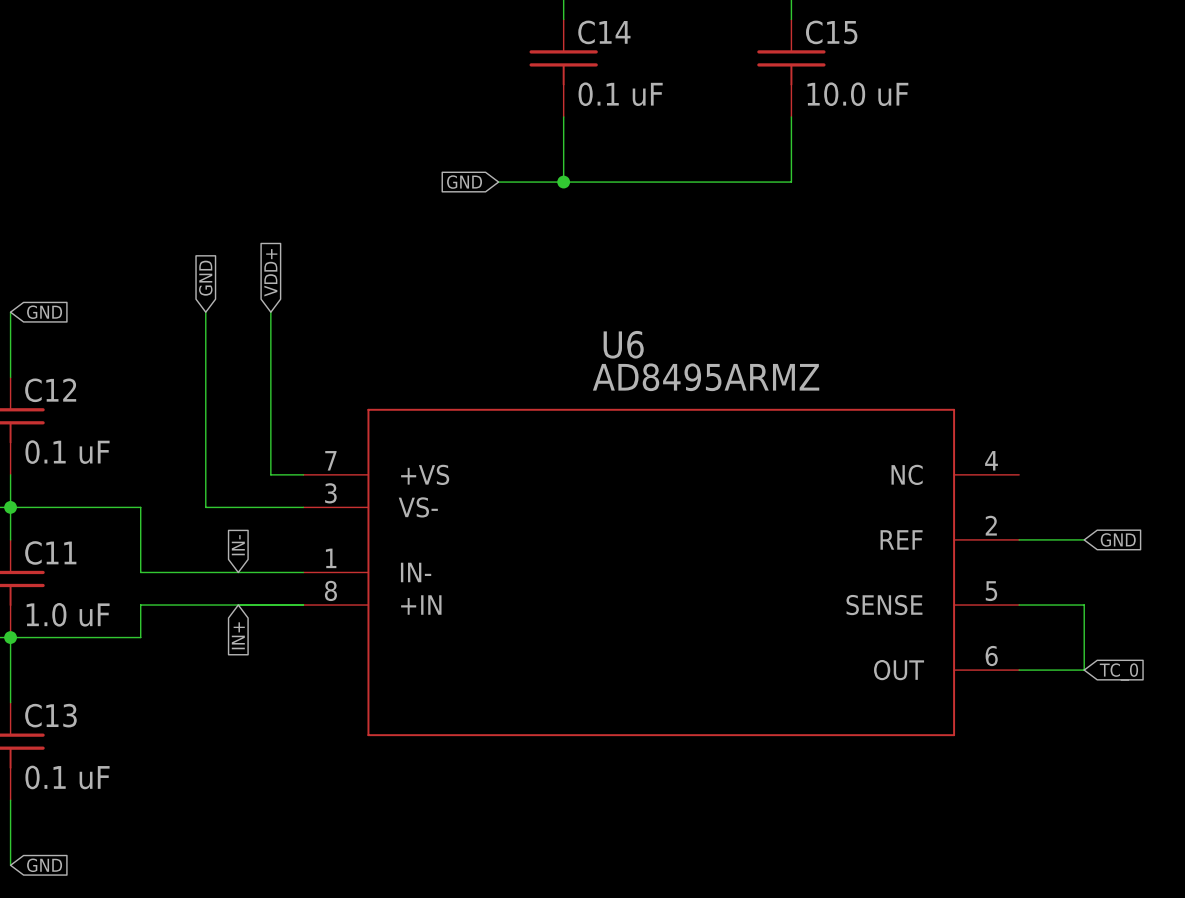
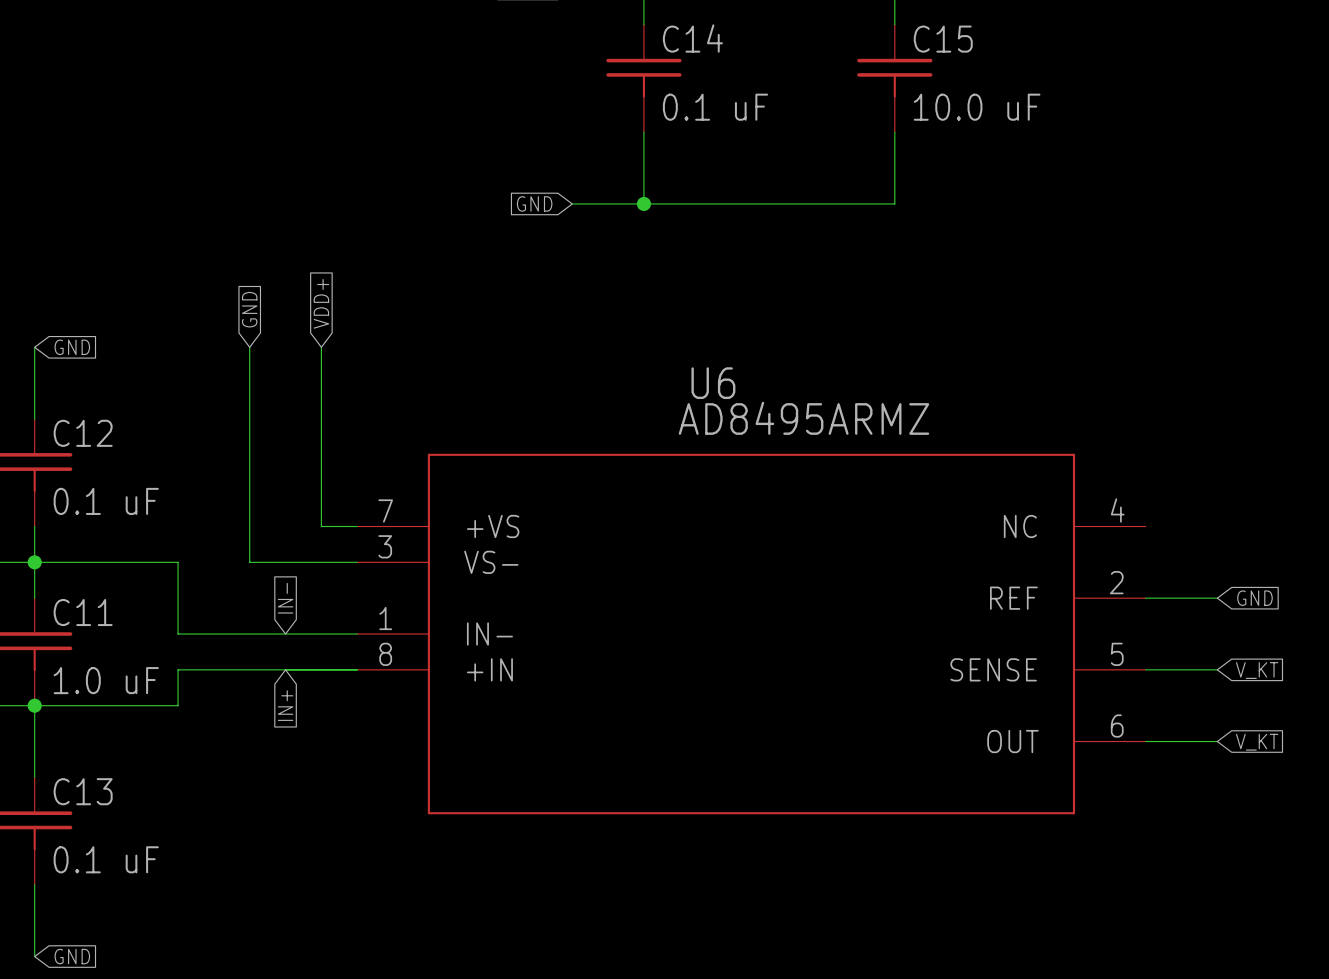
wire: (1084, 605) (1084, 670) -> none
global label: none -> V_KT (1257, 670)
global label: TC_0 (1118, 672) -> V_KT (1257, 742)

